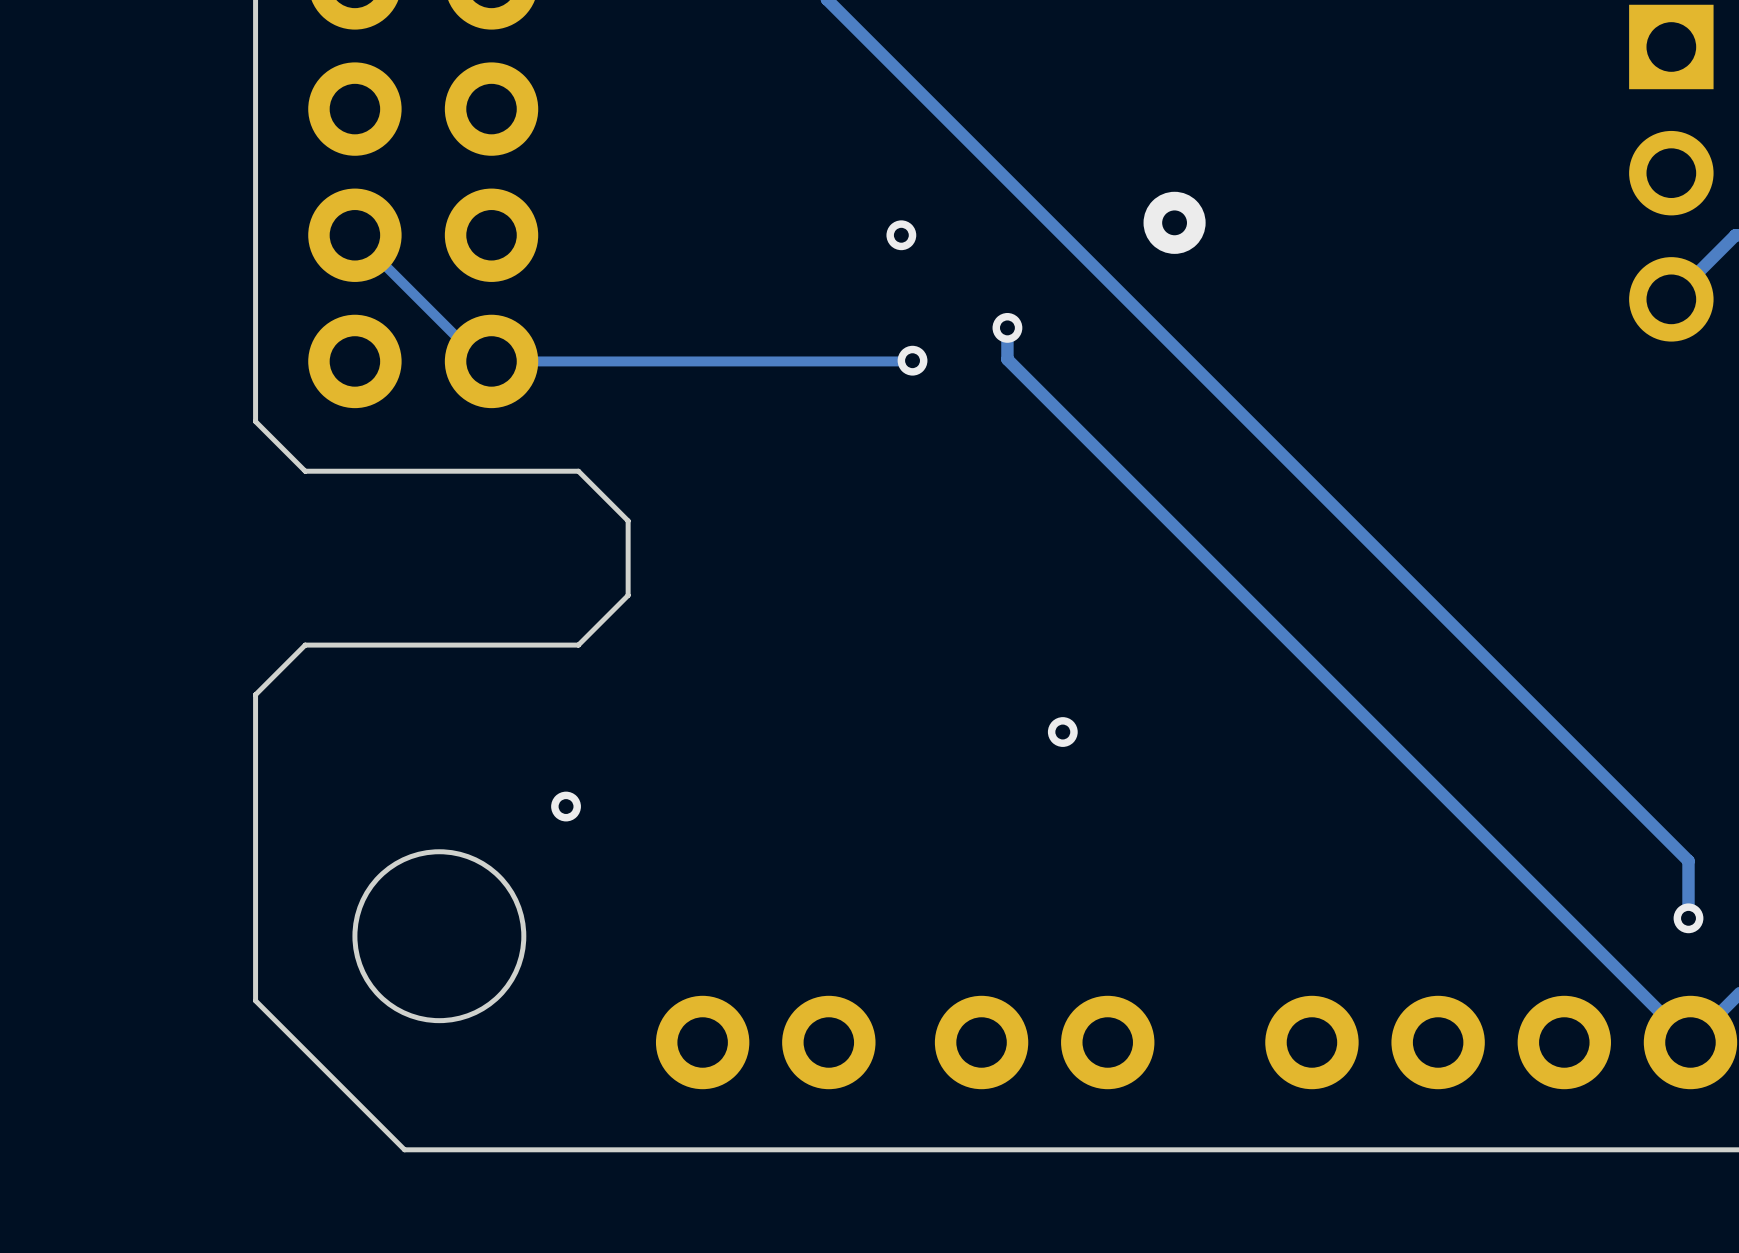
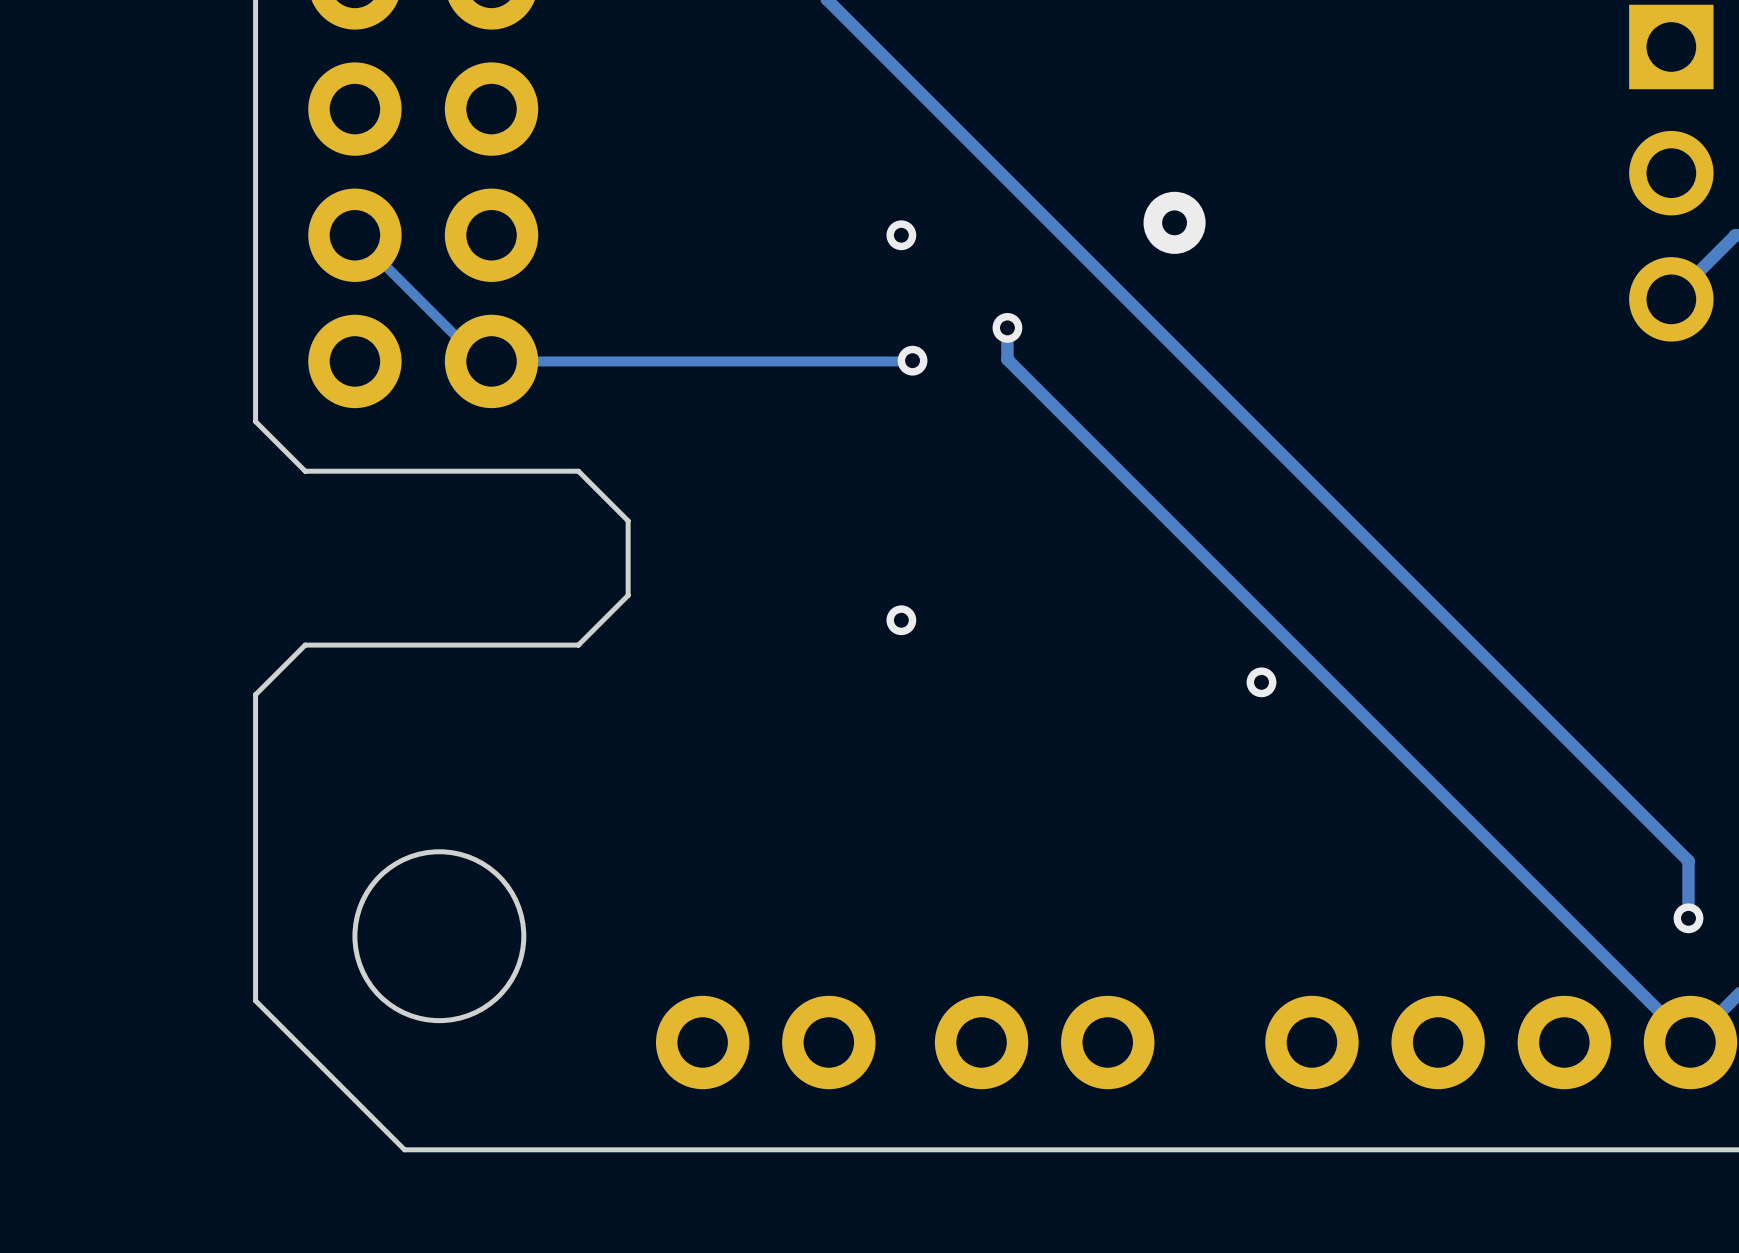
via: none -> (901, 620)
via: none -> (1261, 682)
via: (1062, 732) -> none
via: (566, 806) -> none

